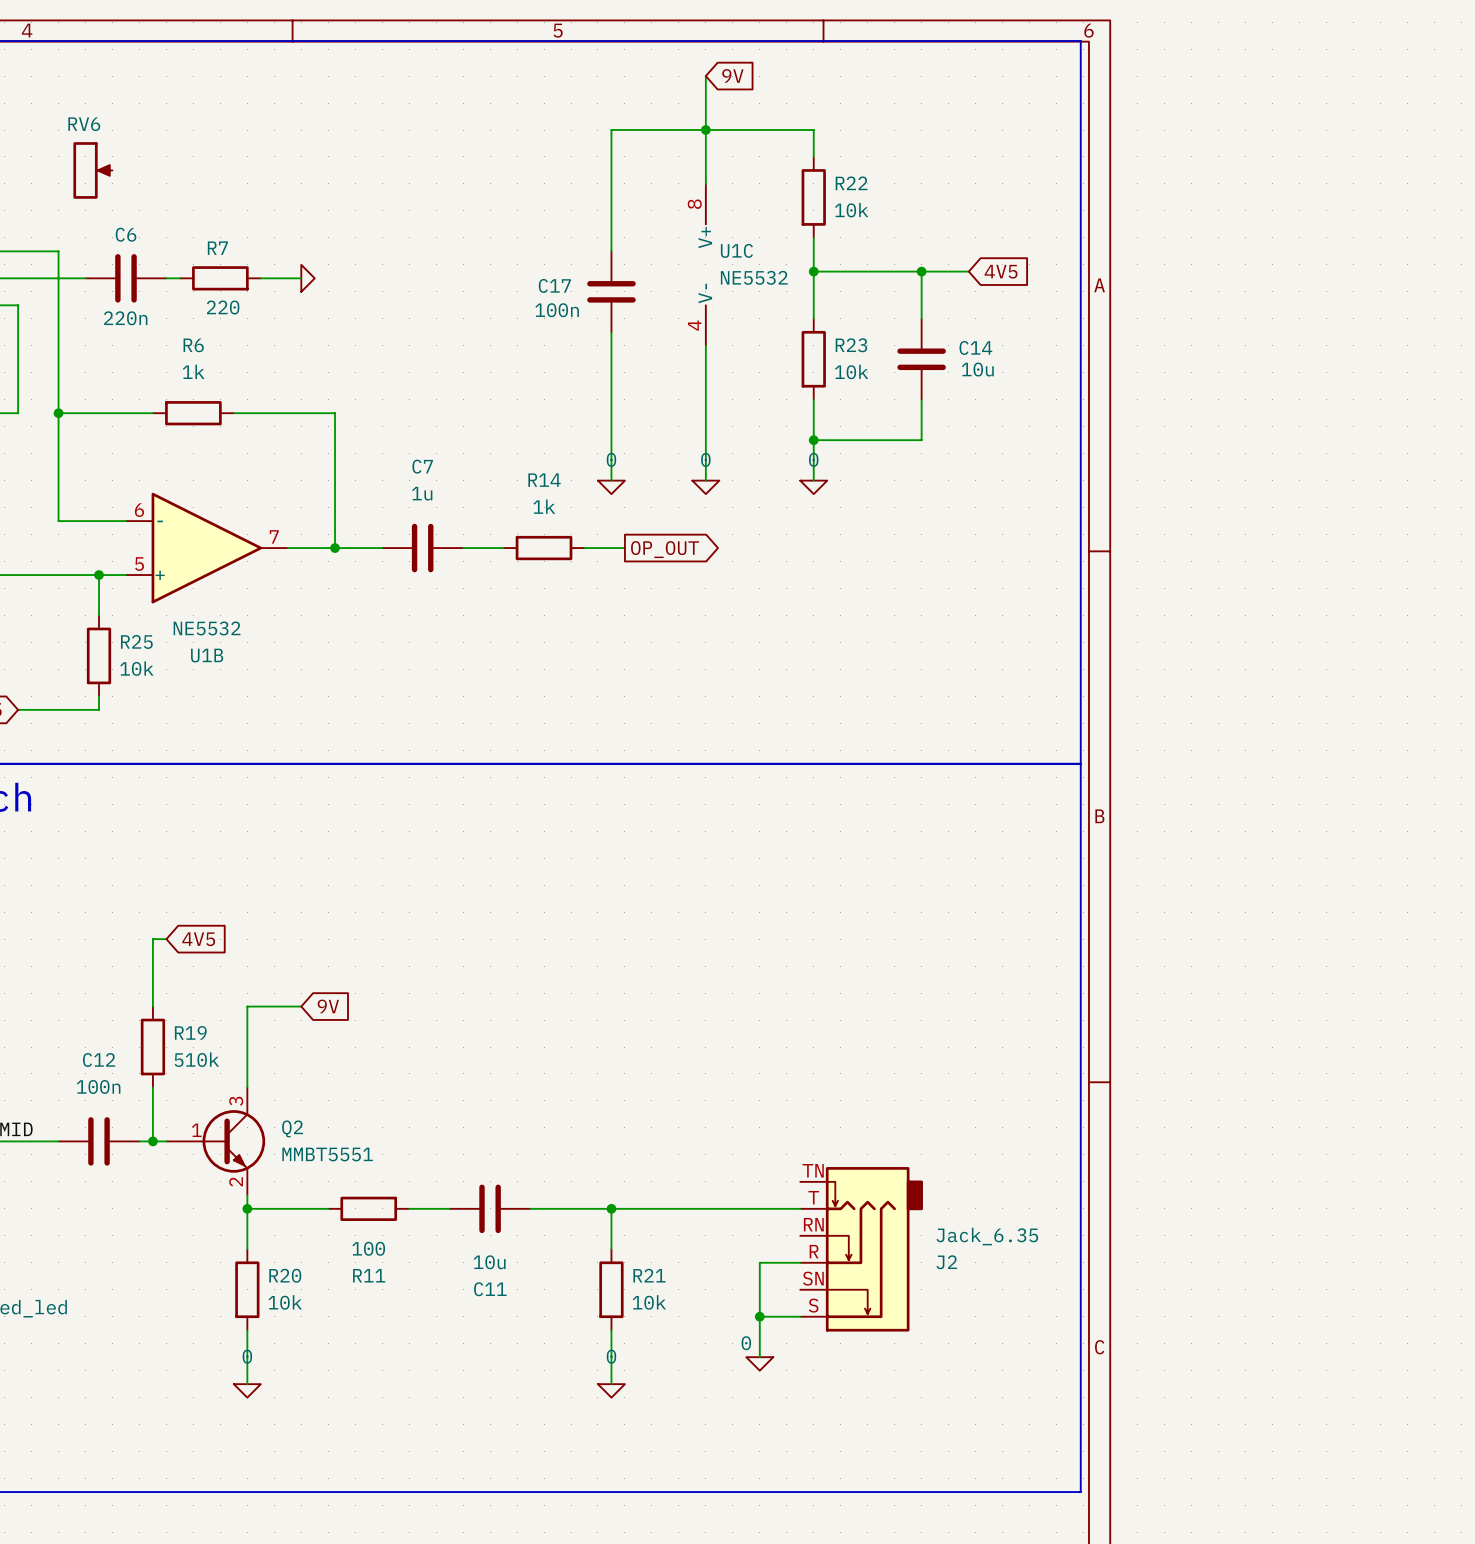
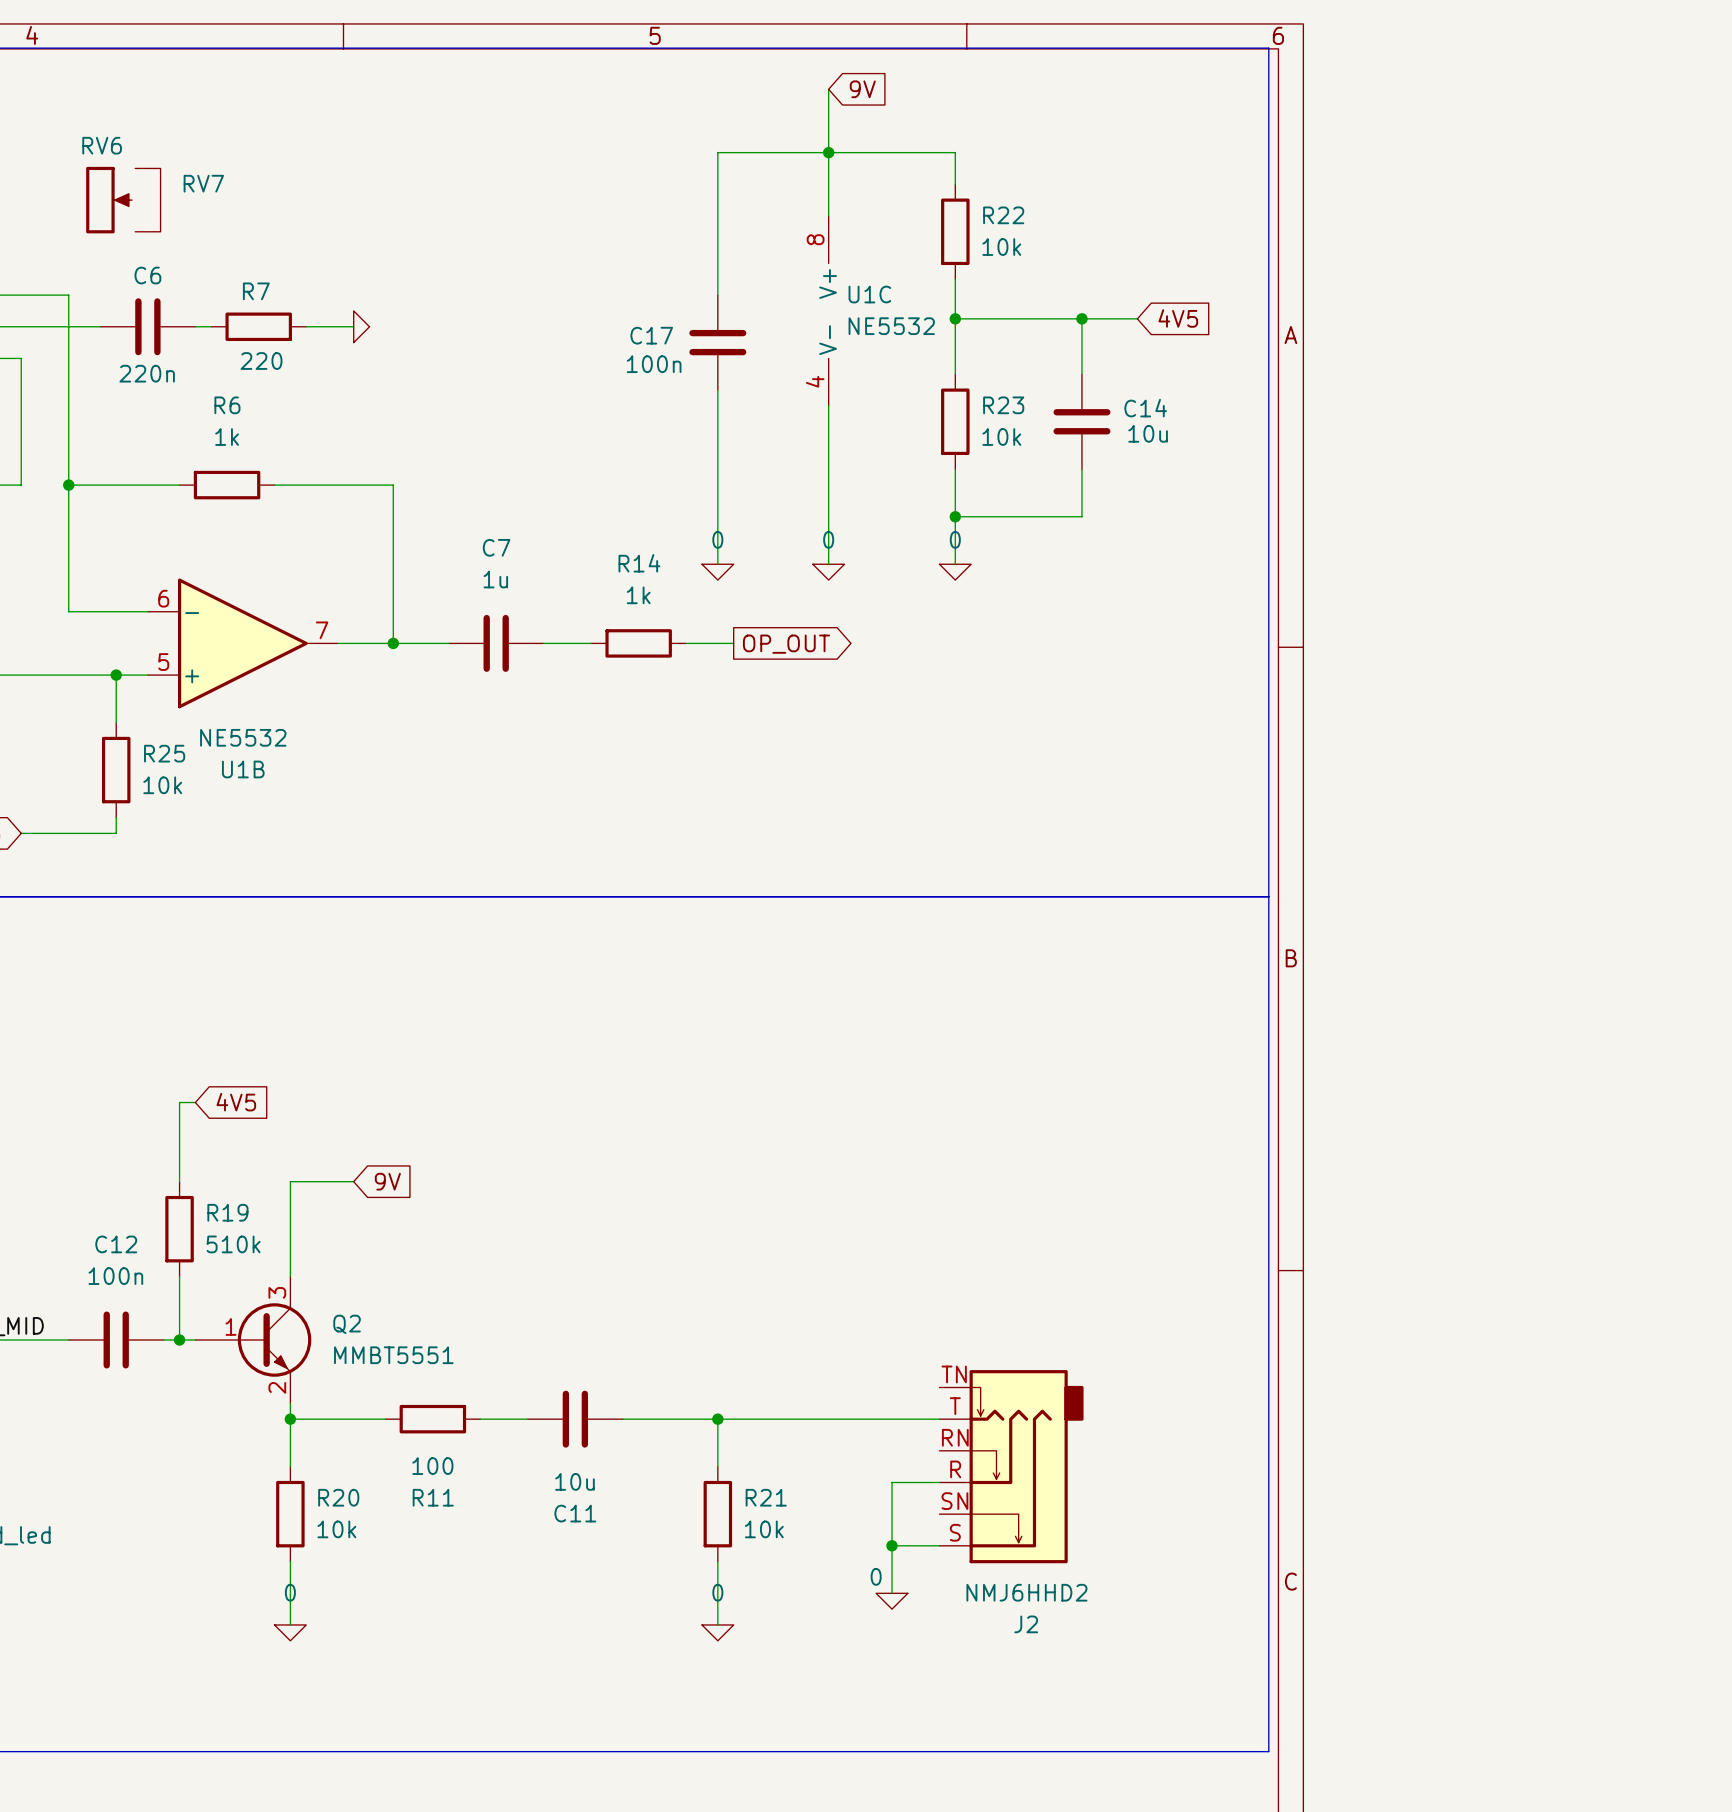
RV7: none -> (147, 200)
J2 value: Jack_6.35 (987, 1236) -> NMJ6HHD2 (1026, 1592)
J2 name position: J2 (946, 1262) -> J2 (1026, 1624)

